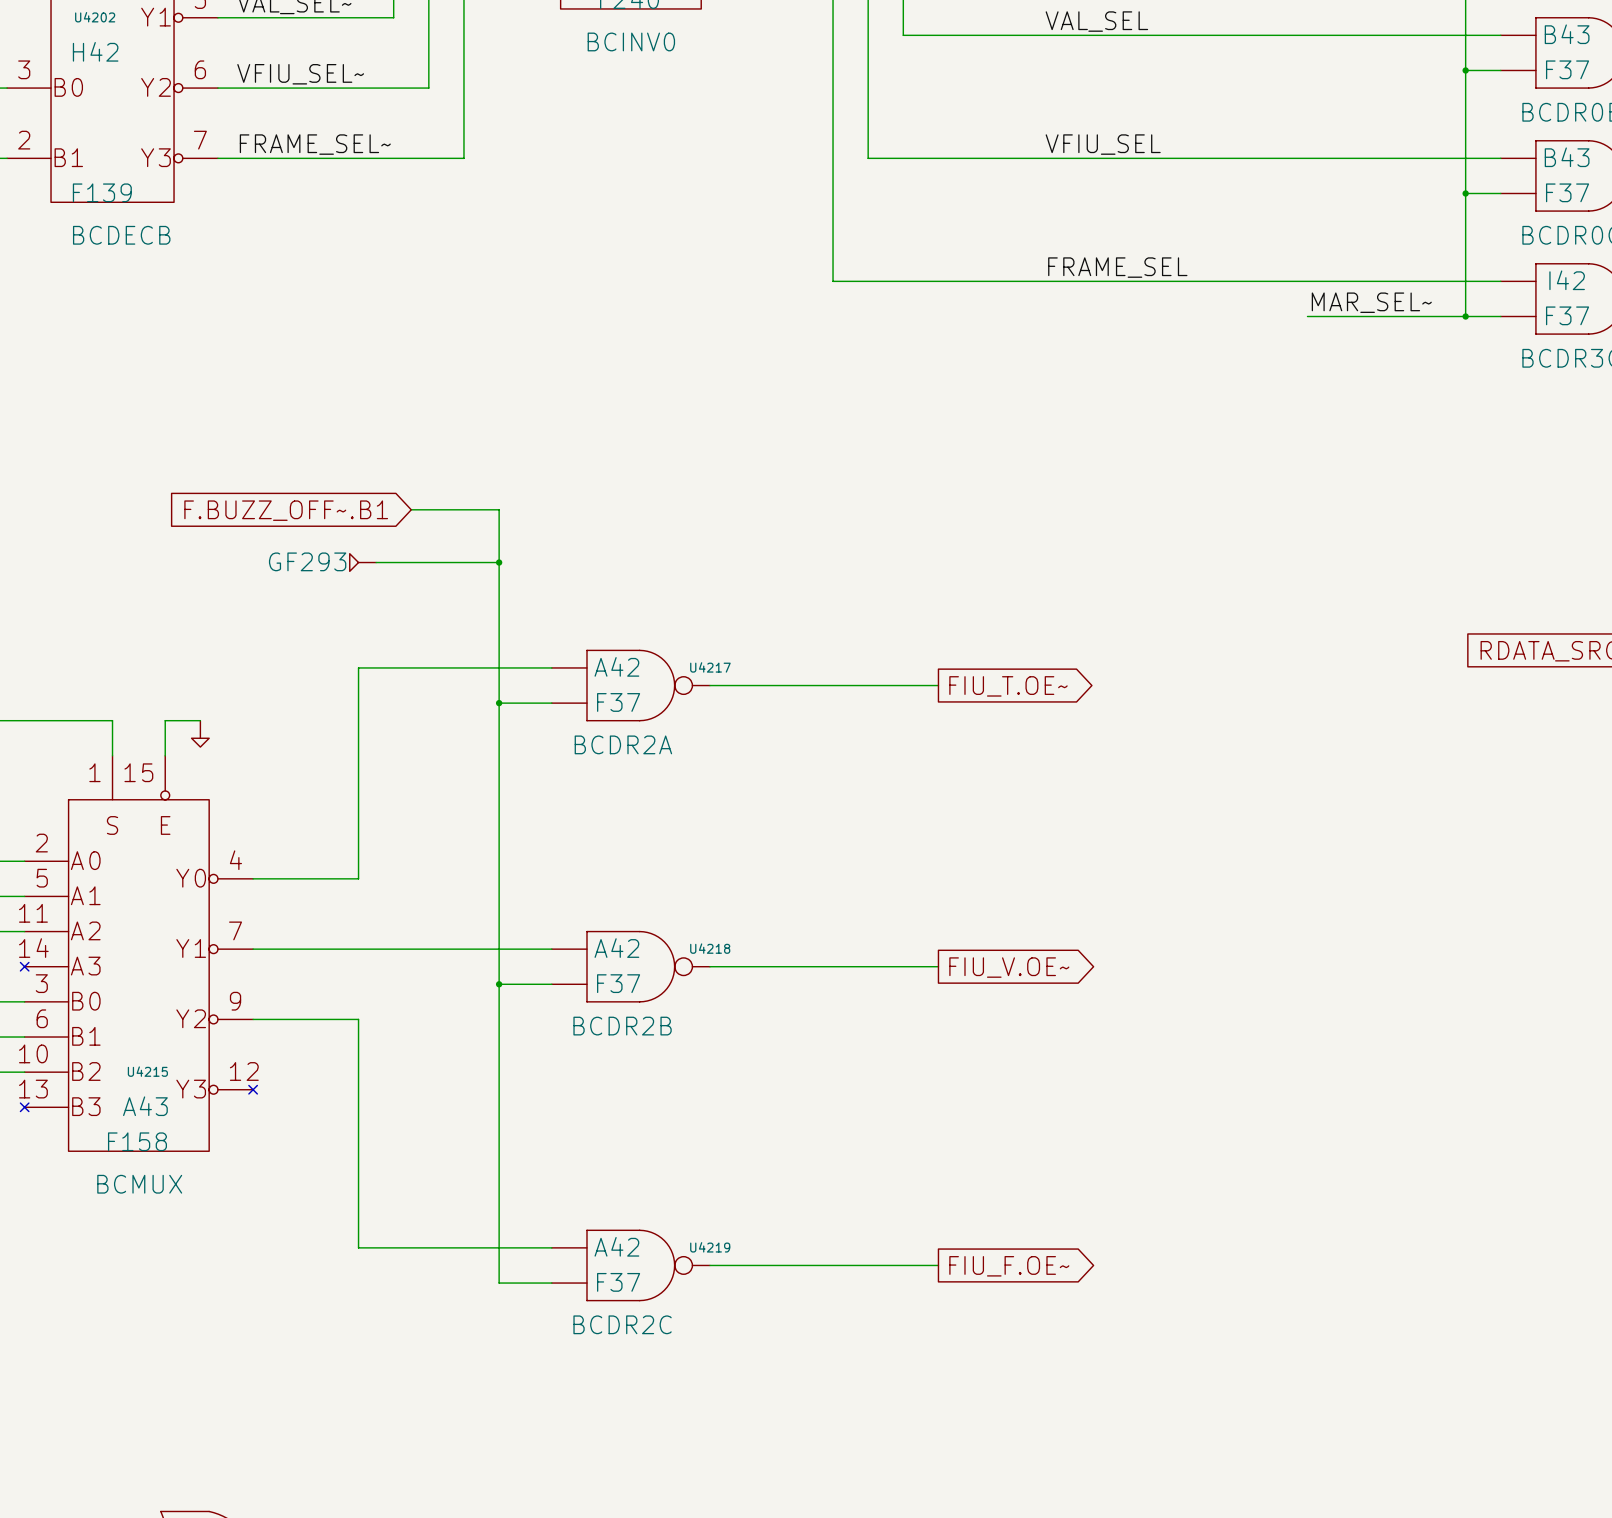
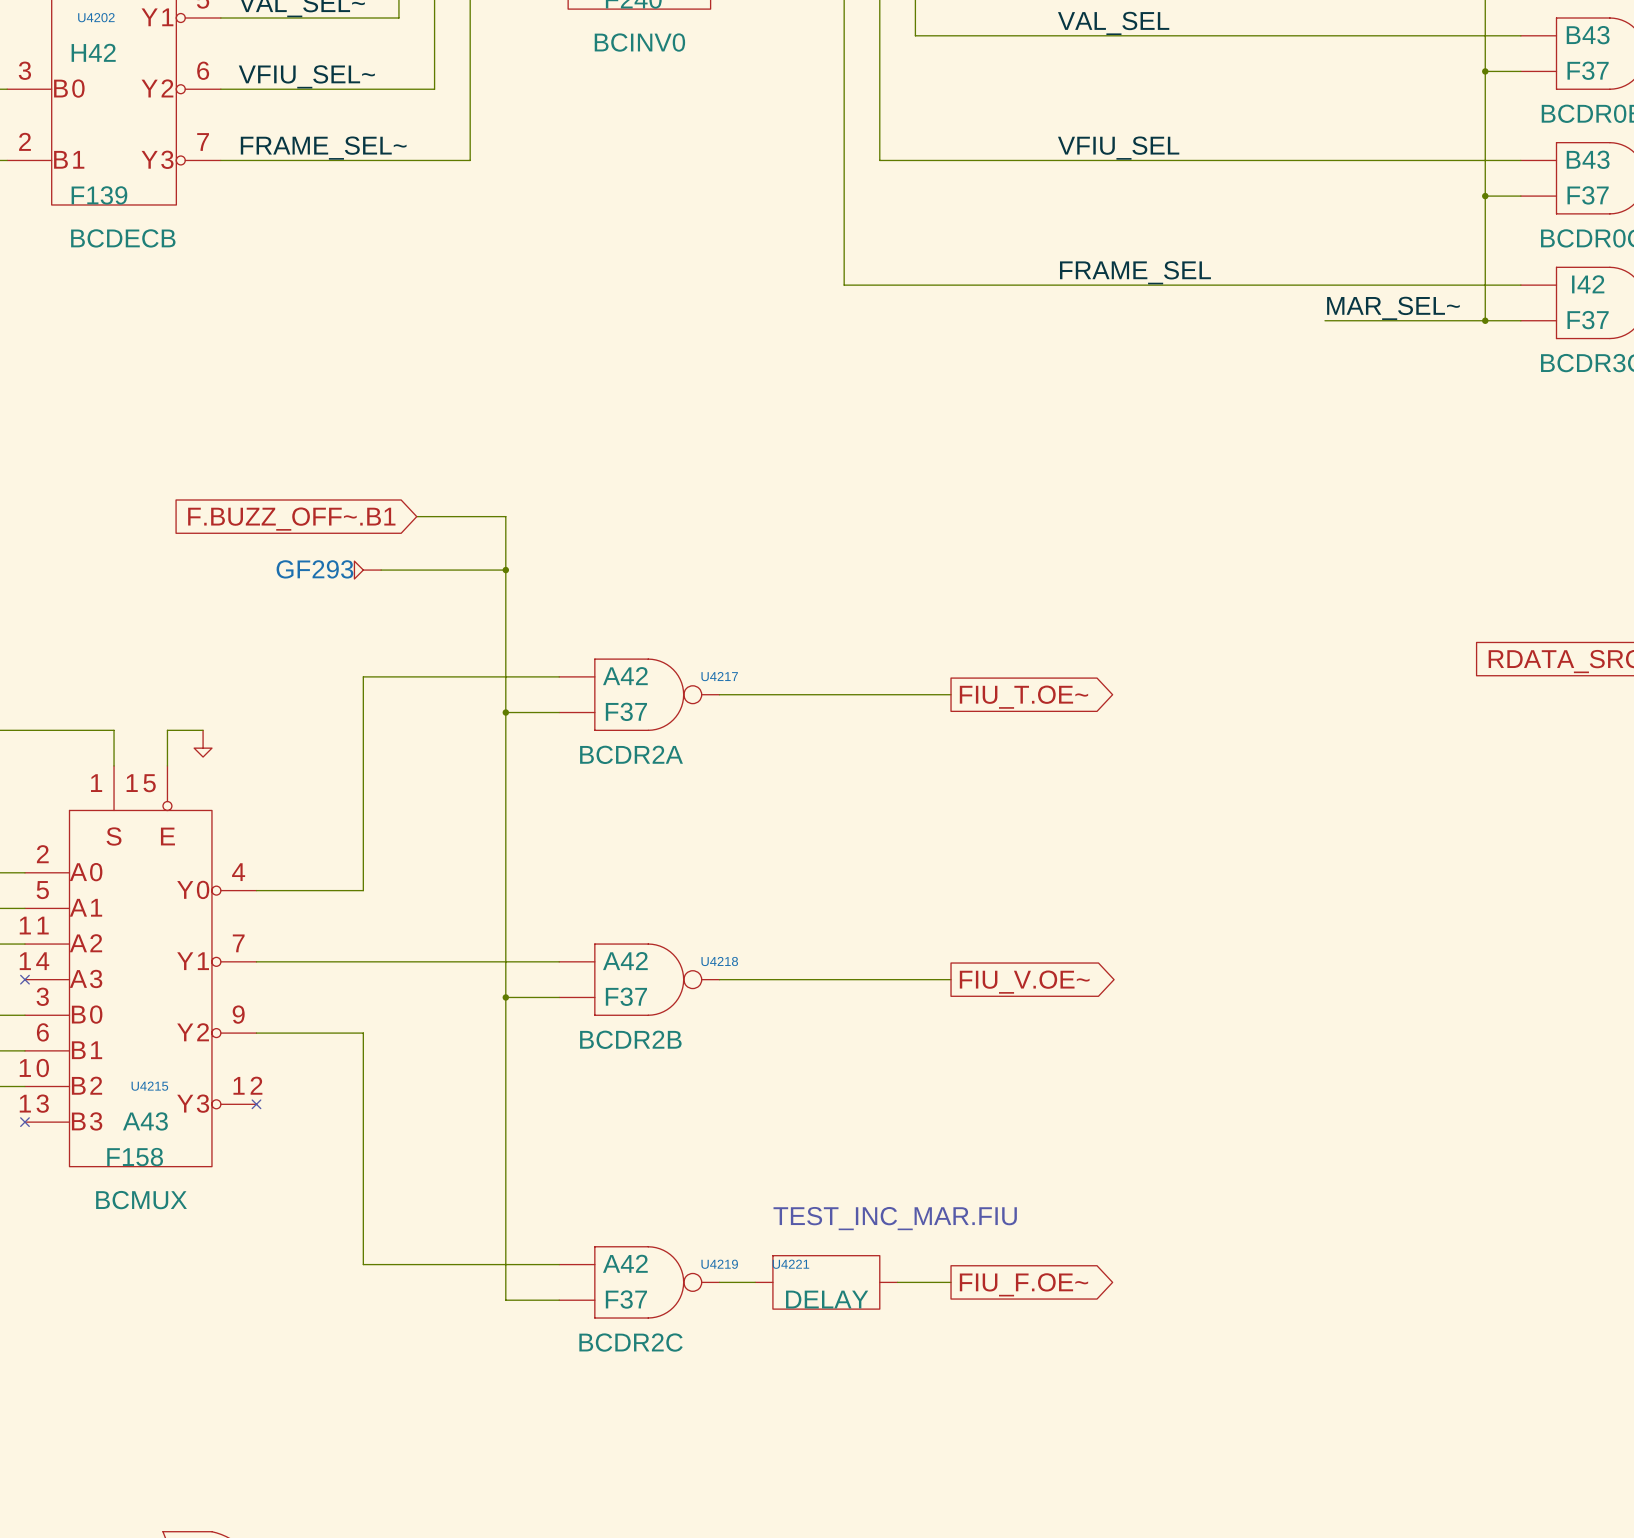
text: none -> TEST_INC_MAR.FIU (895, 1218)
wire: (745, 1265) (885, 1265) -> none
U4221: none -> DELAY (826, 1282)

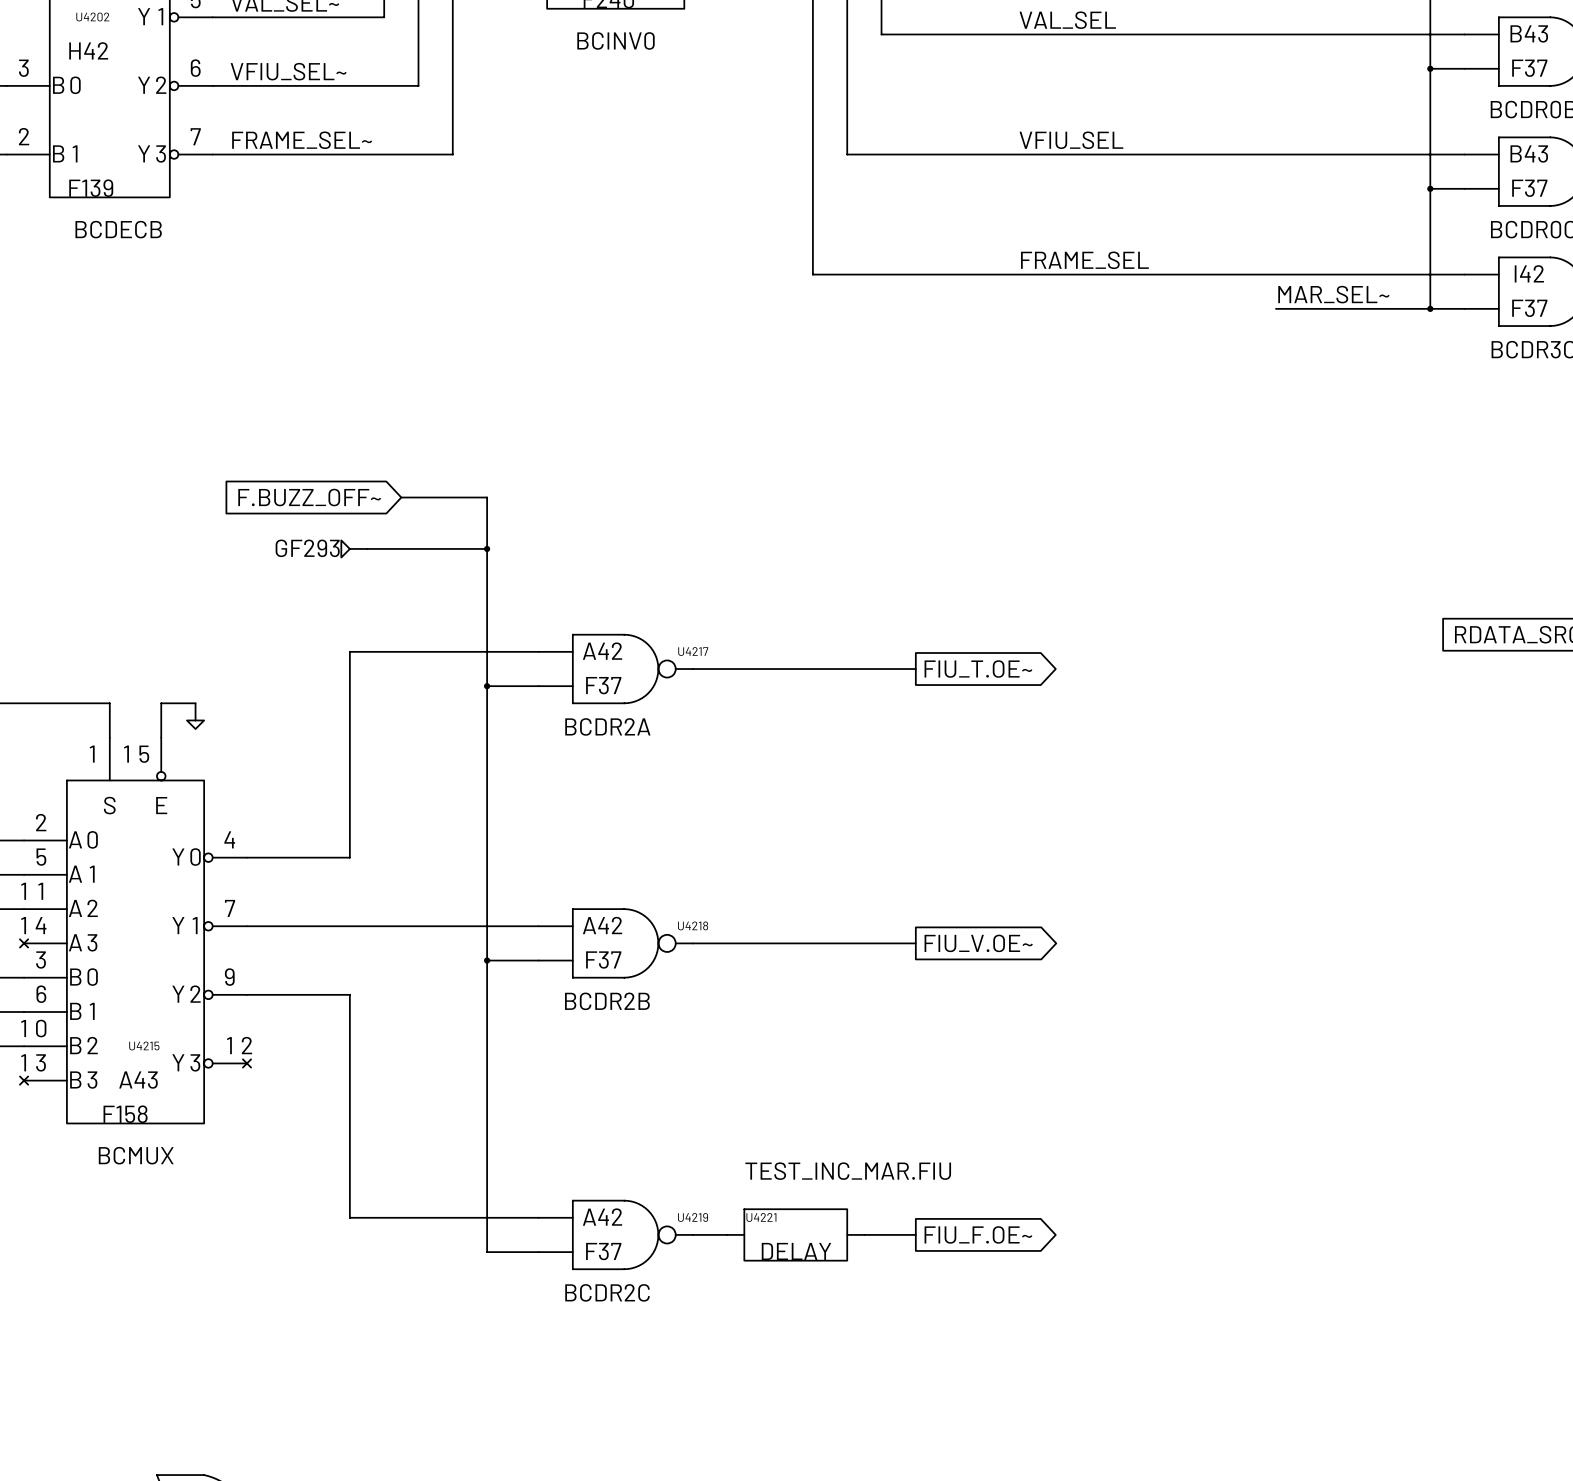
global label: F.BUZZ_OFF~.B1 (291, 519) -> F.BUZZ_OFF~ (309, 497)

